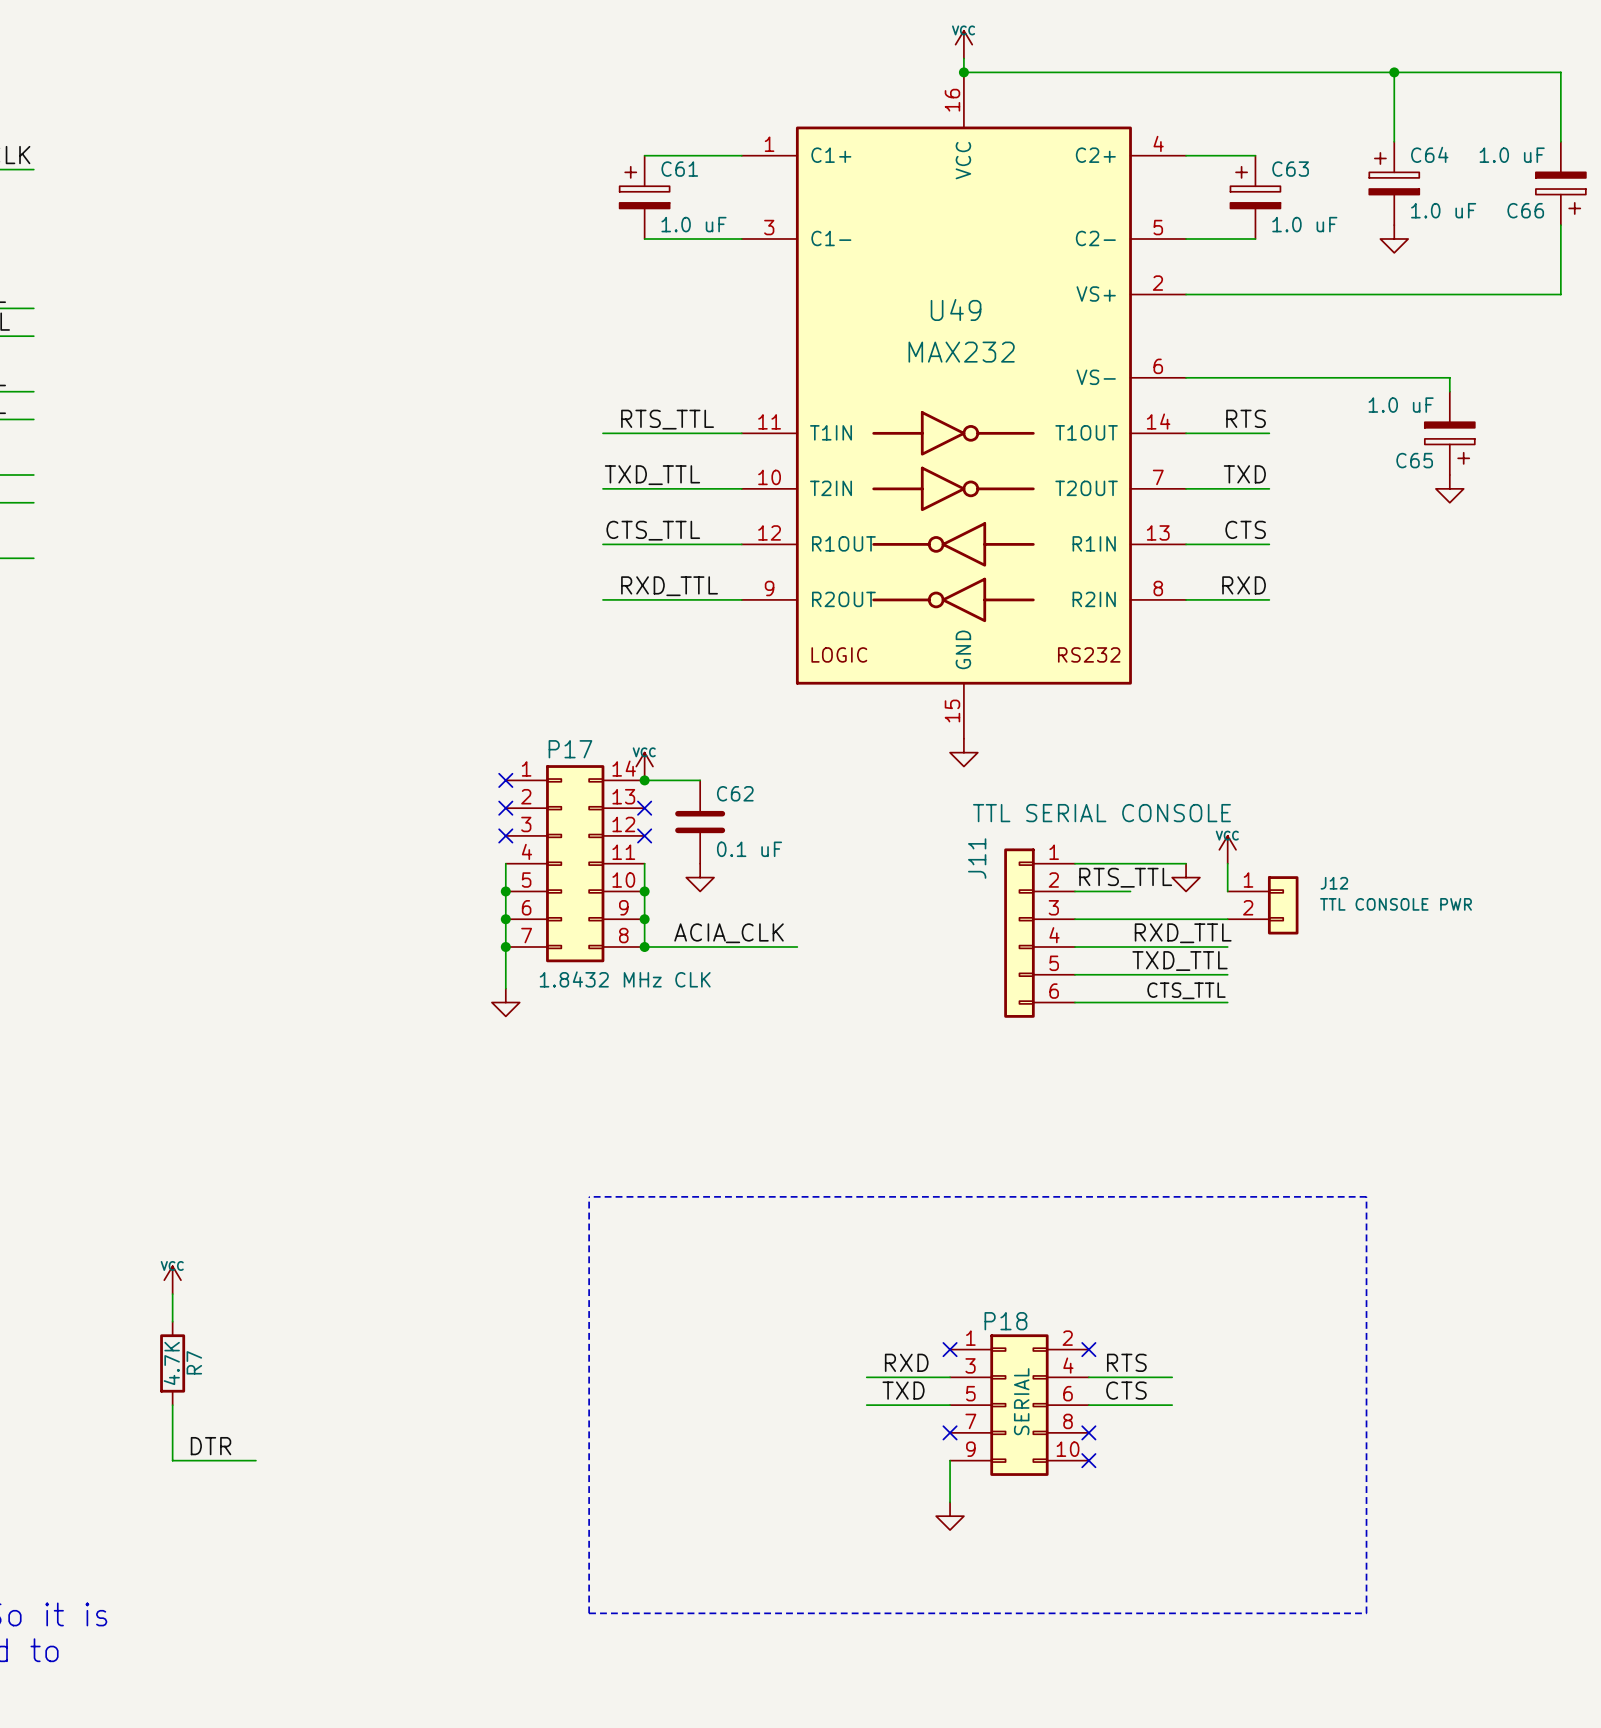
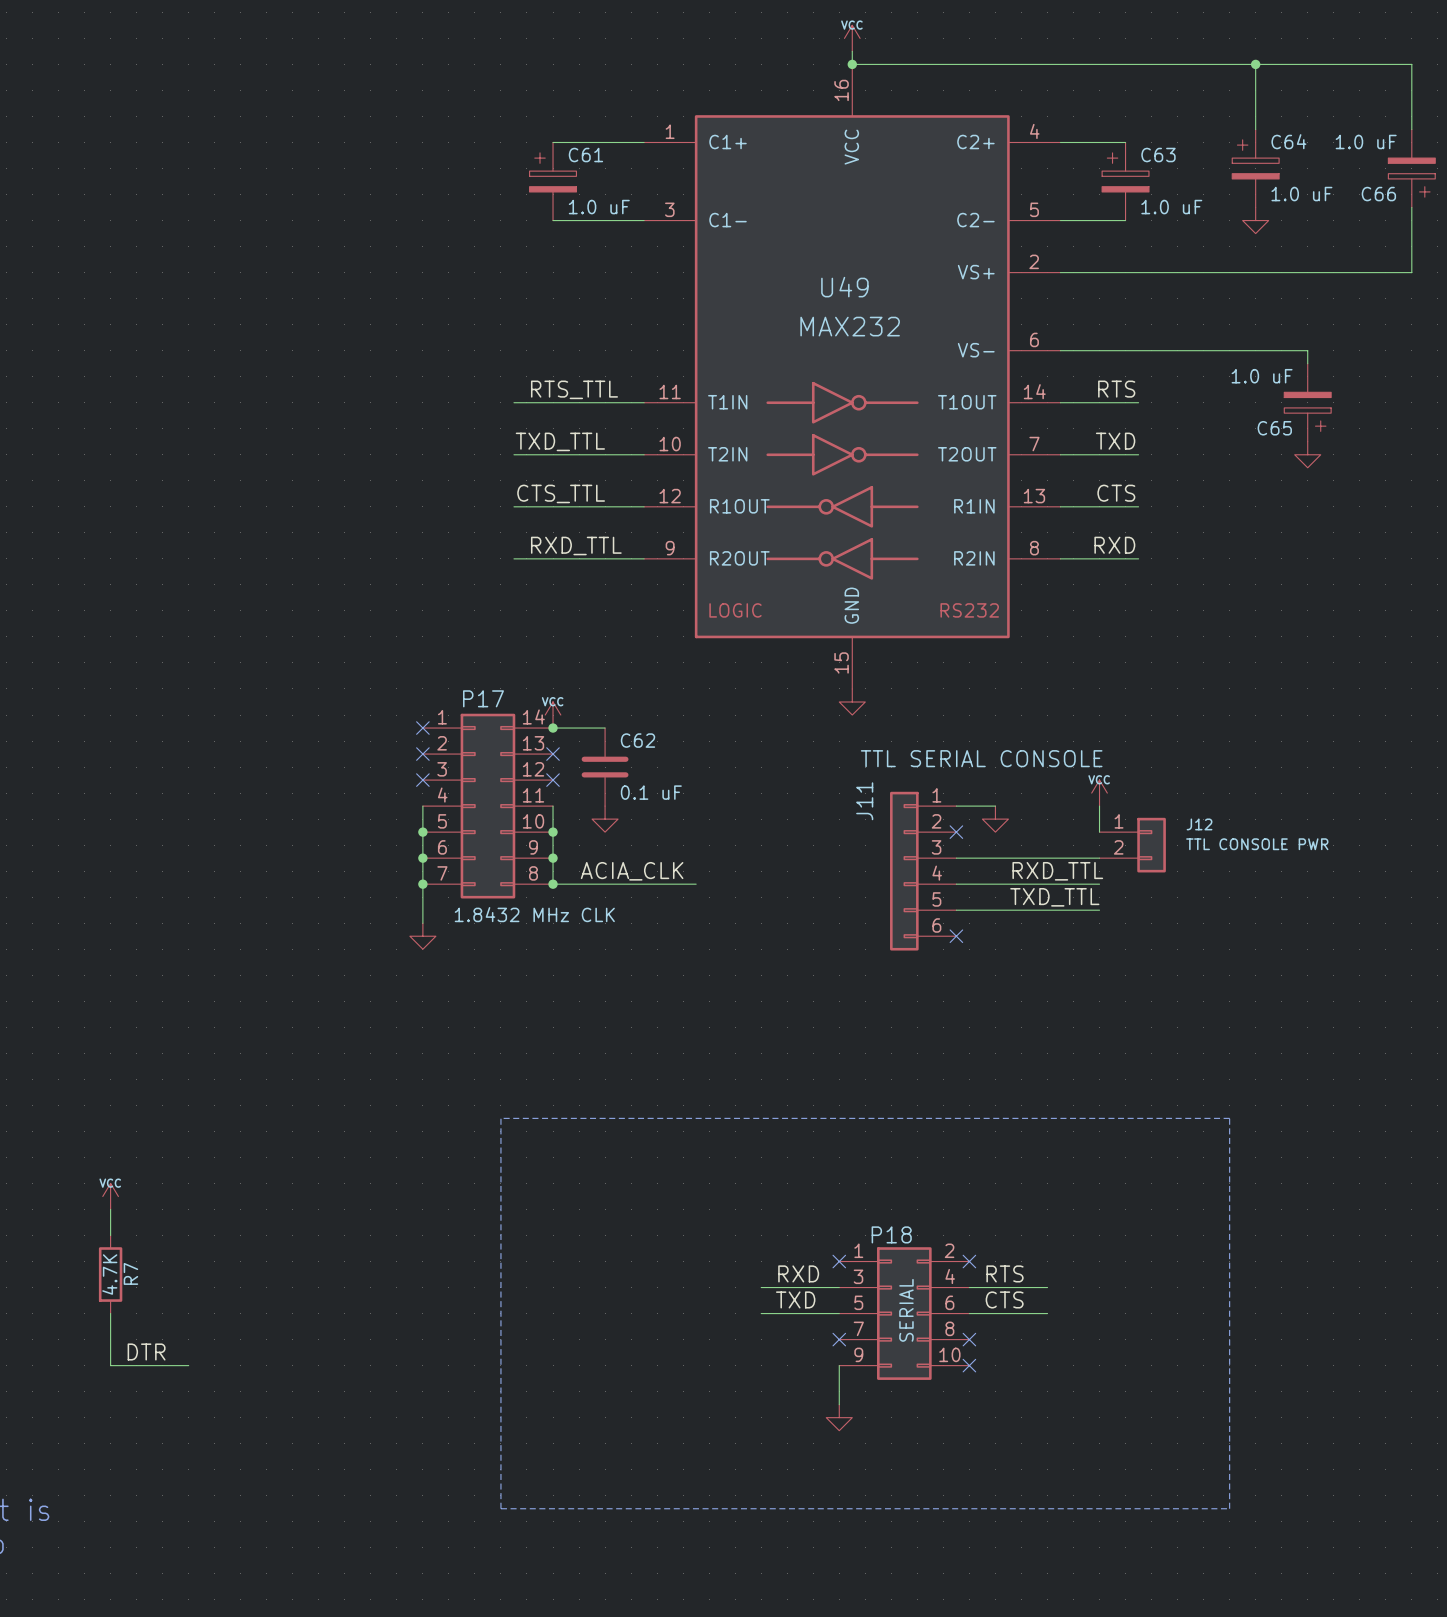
wire: (1116, 863) (1186, 863) -> none
label: RTS_TTL (1125, 877) -> none
power symbol position: (1186, 877) -> (995, 819)
wire: (1074, 891) (1130, 891) -> none
no-connect mark: none -> (956, 832)
label: CTS_TTL (1186, 990) -> none
wire: (1074, 1002) (1227, 1002) -> none
no-connect mark: none -> (956, 936)

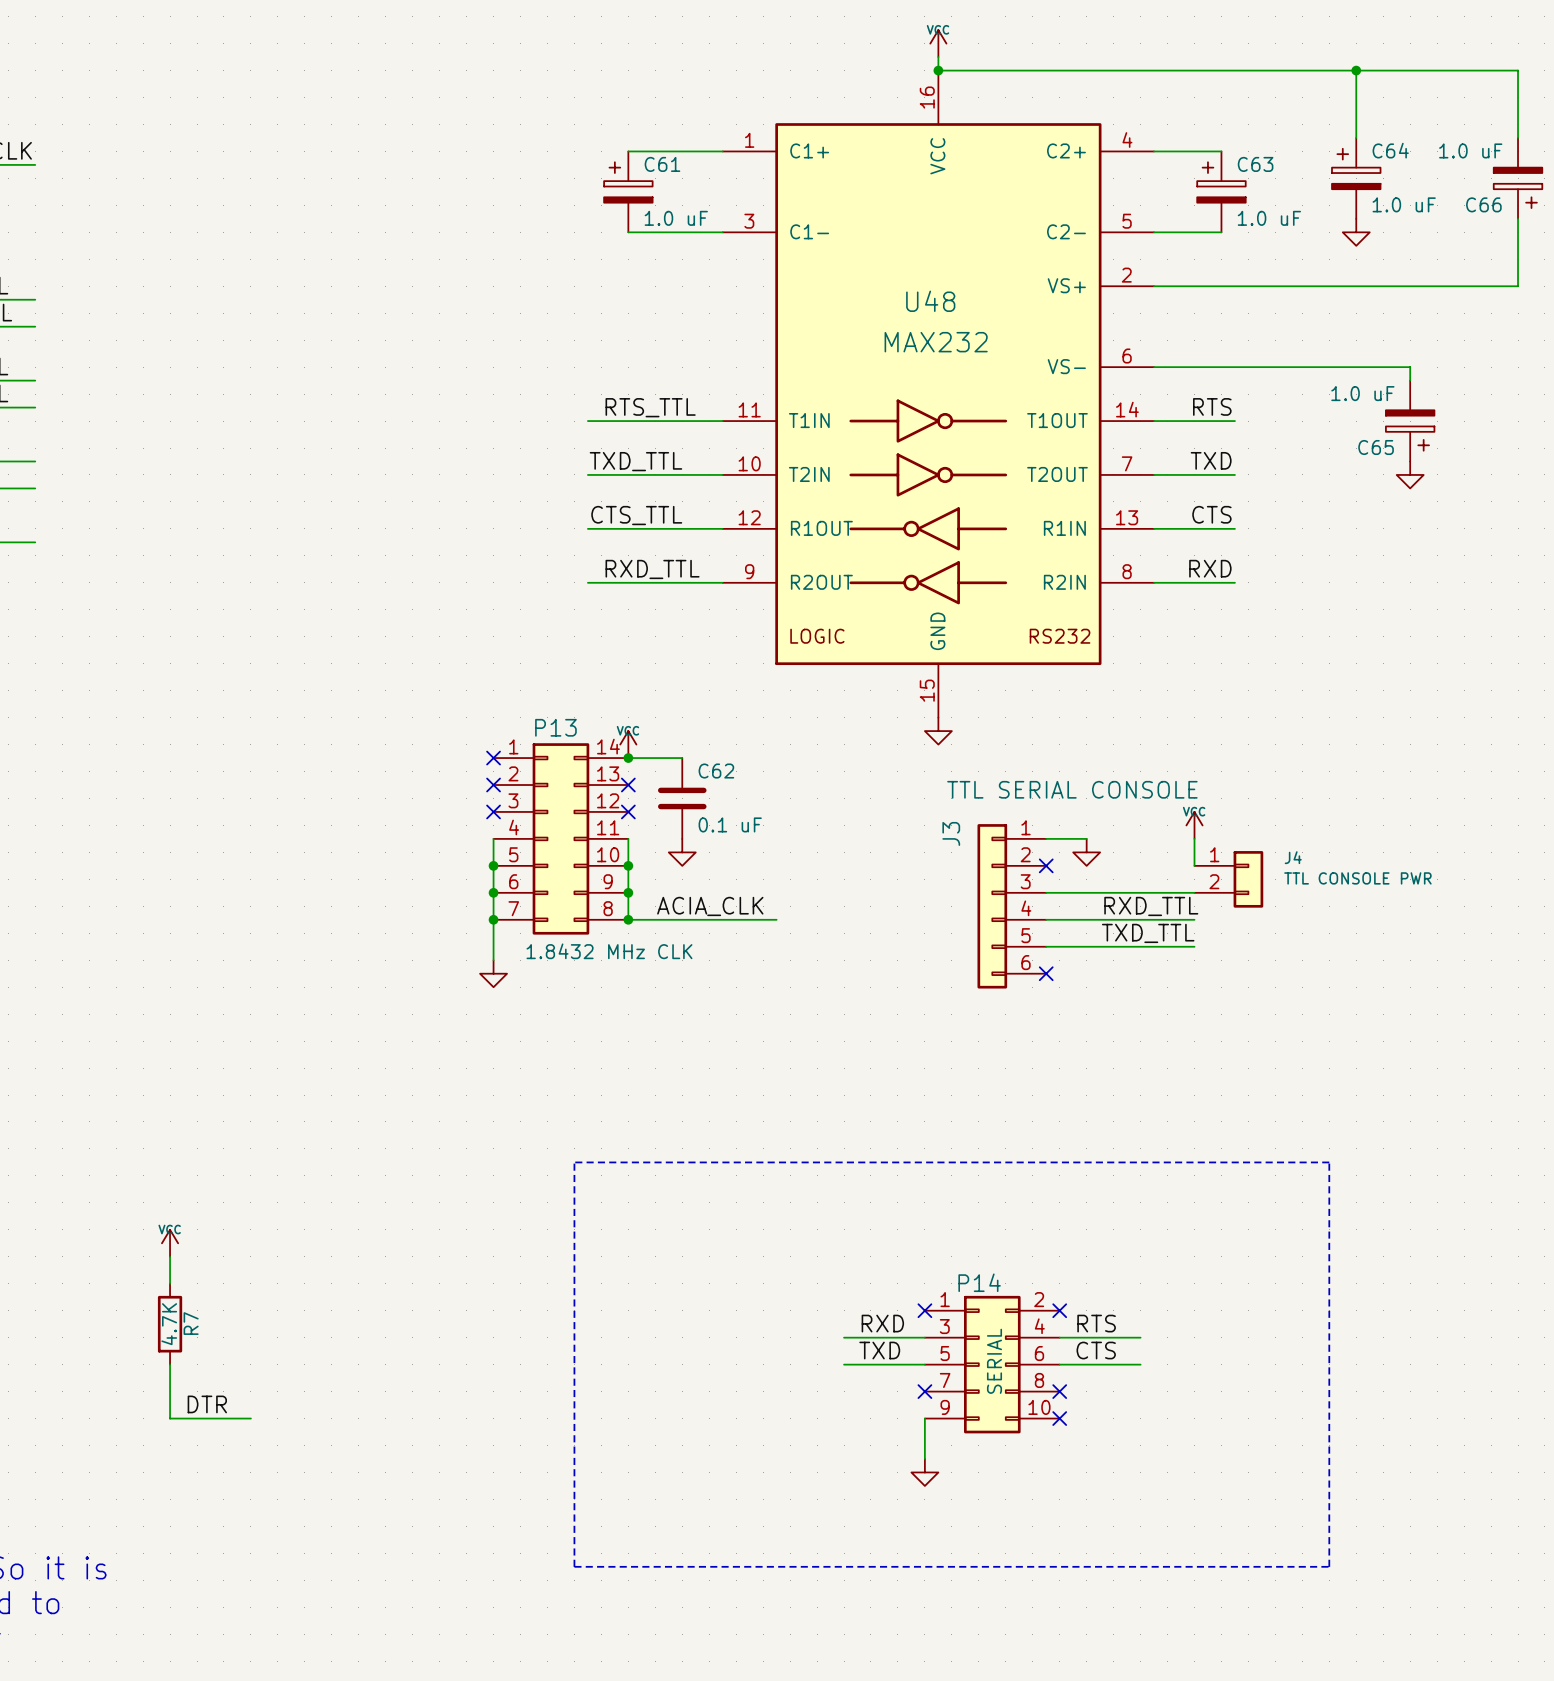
U49 name: U49 (844, 287) -> U48 (930, 301)
P17 name: P17 (483, 698) -> P13 (555, 727)
J11 name: J11 (864, 801) -> J3 (951, 833)
J12 name: J12 (1199, 824) -> J4 (1293, 857)
P18 name: P18 (891, 1234) -> P14 (979, 1282)

